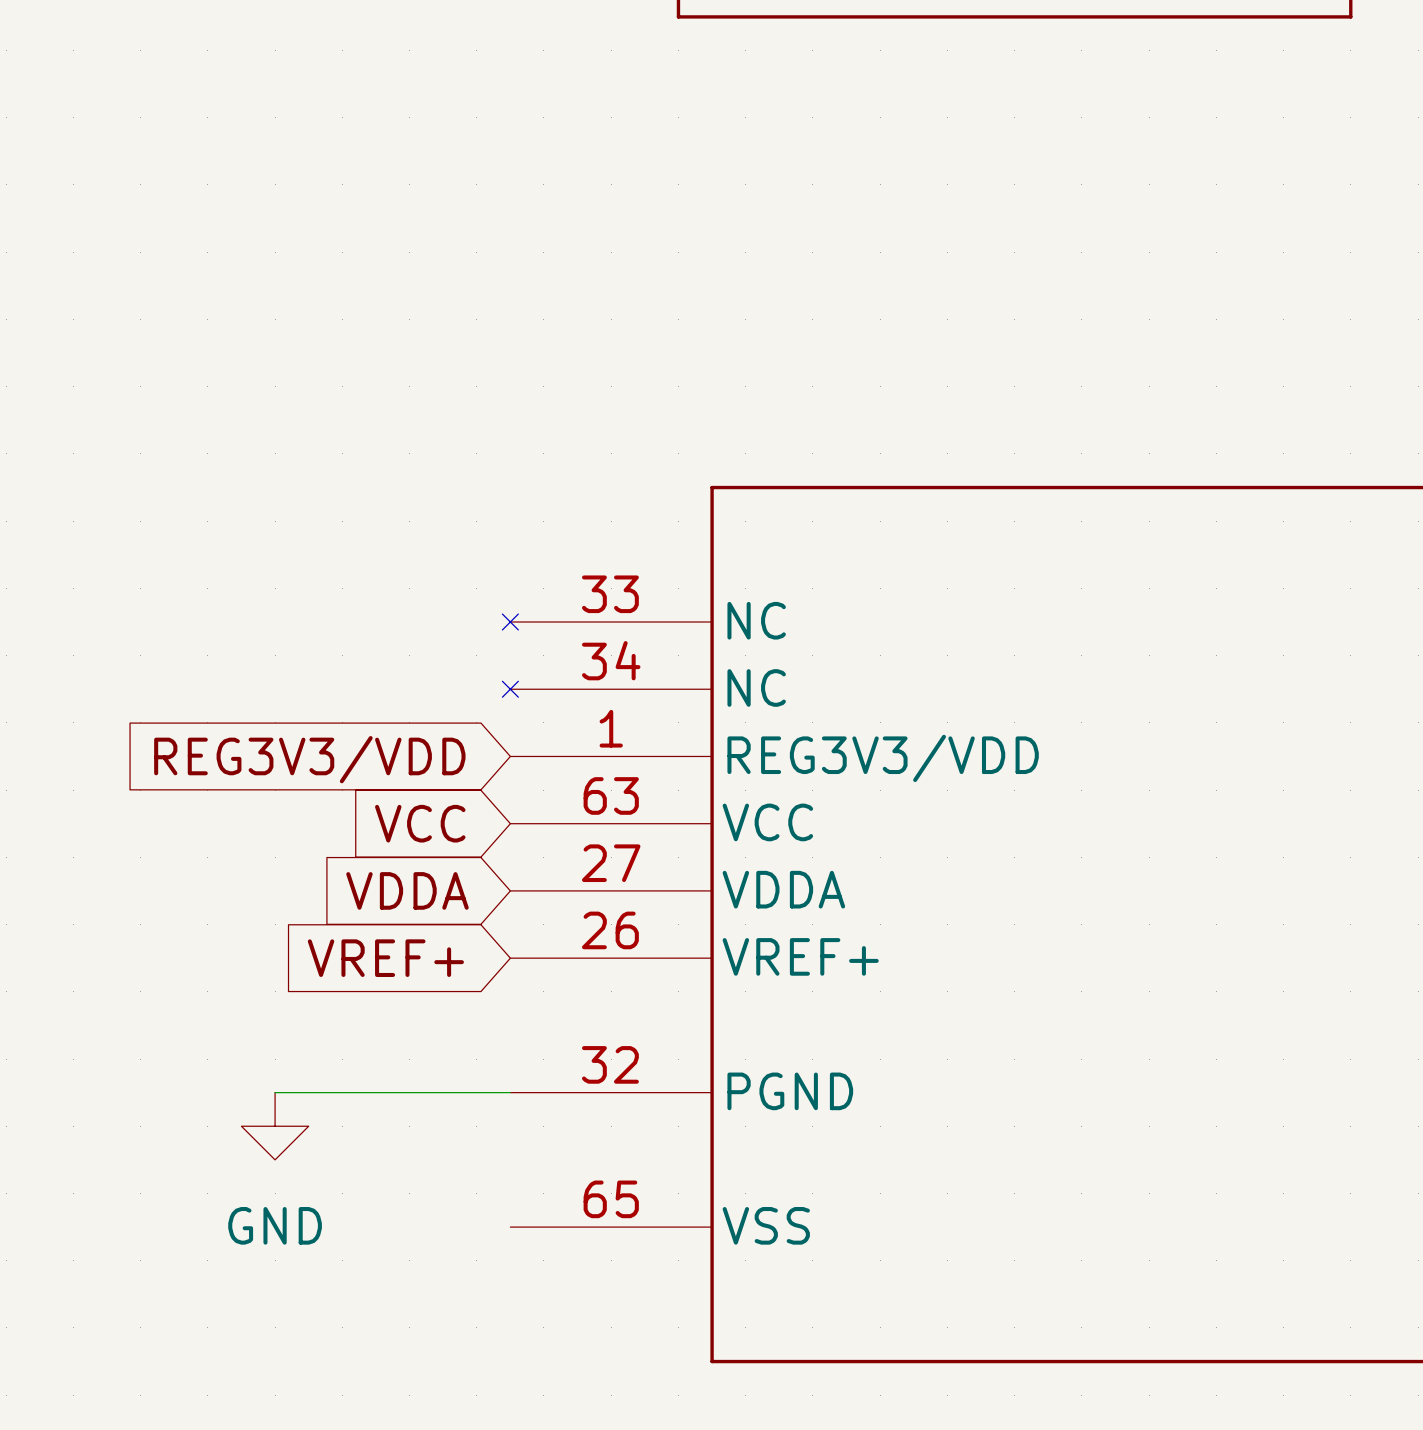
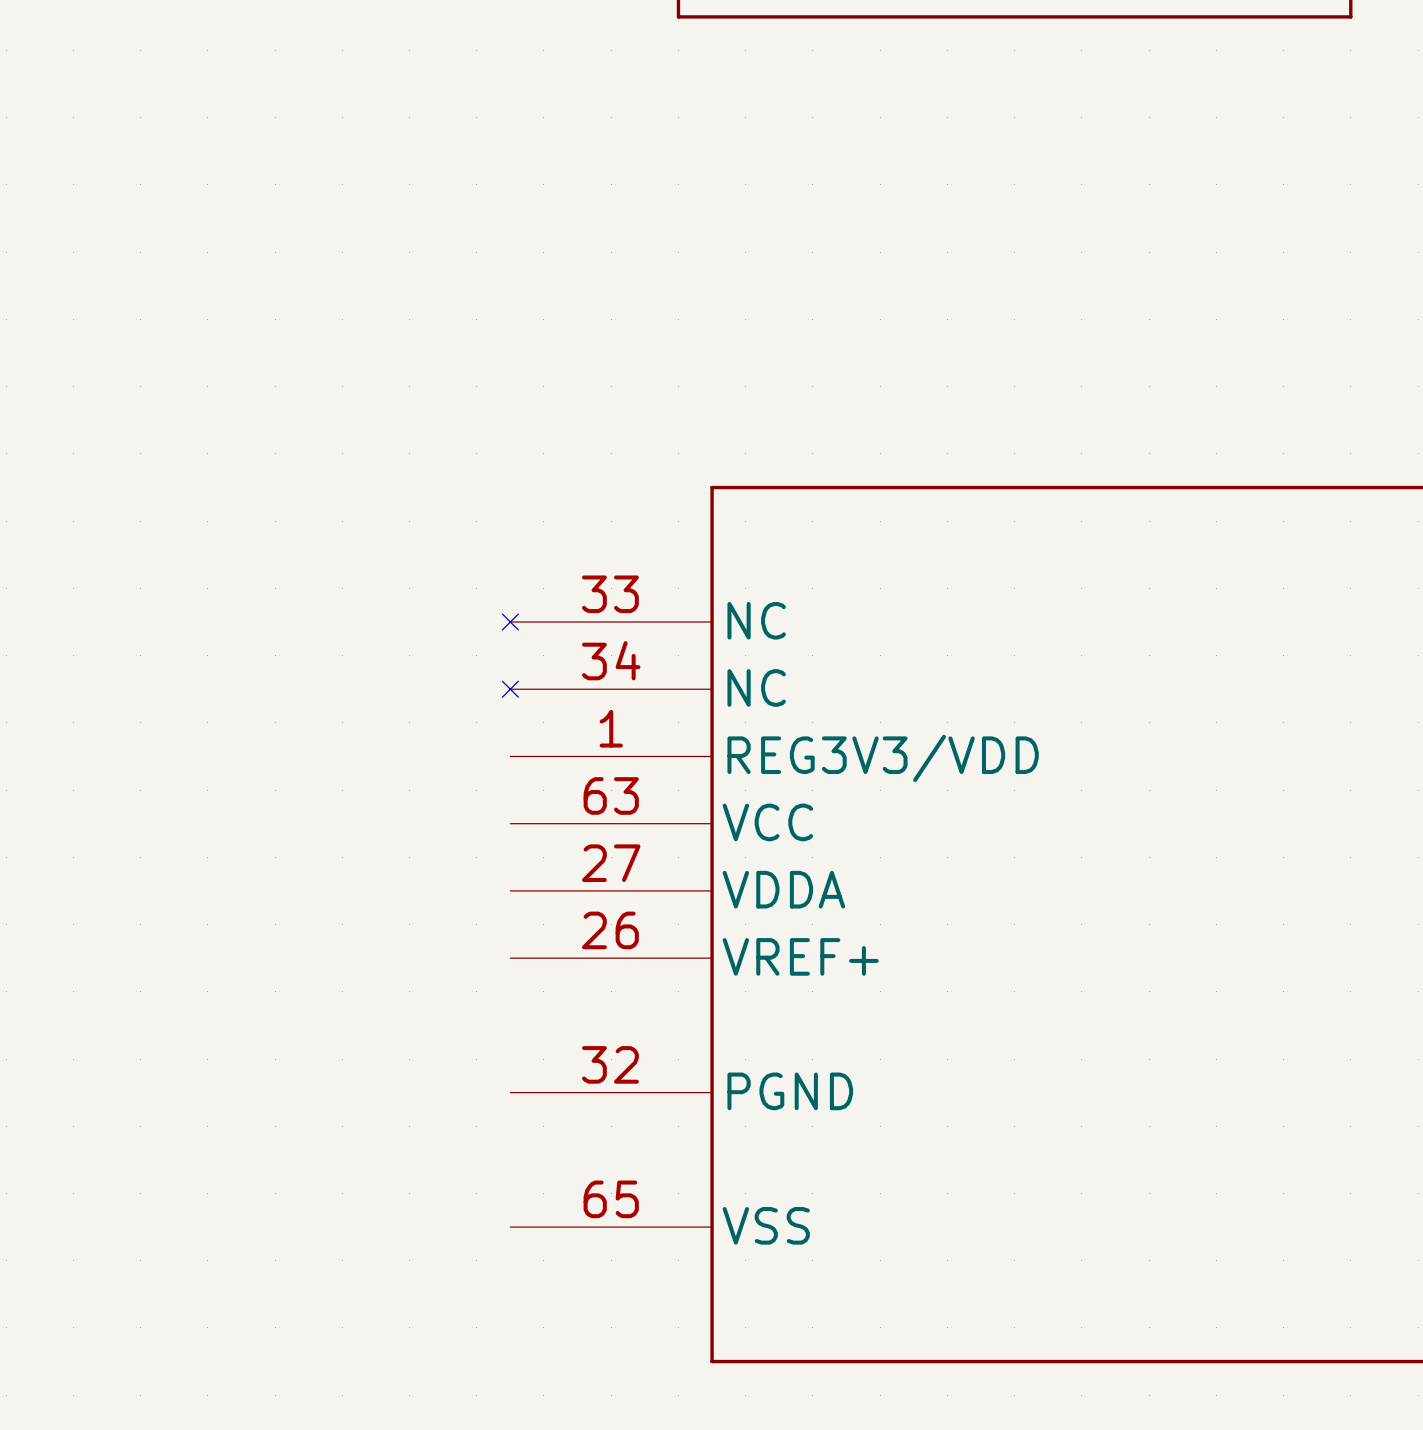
global label: REG3V3/VDD (309, 759) -> none
global label: VCC (420, 823) -> none
global label: VDDA (407, 890) -> none
global label: VREF+ (385, 958) -> none
wire: (275, 1092) (510, 1092) -> none
power symbol: GND (275, 1126) -> none

